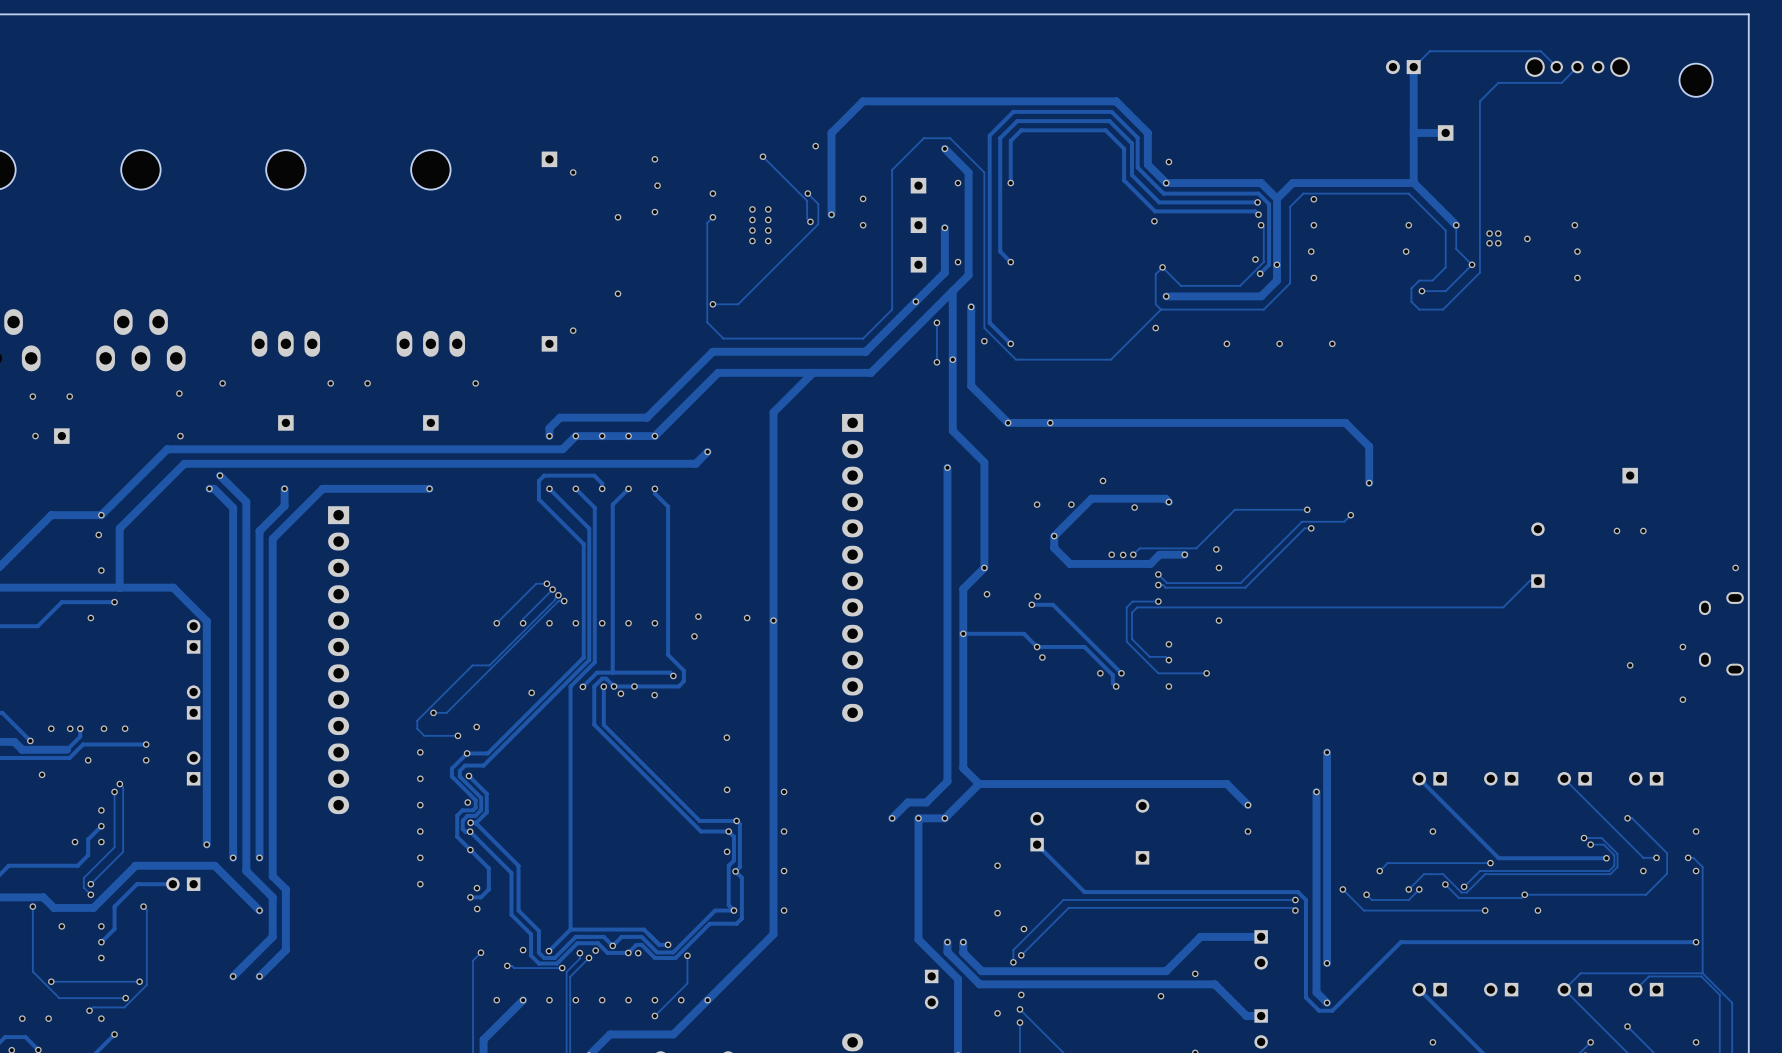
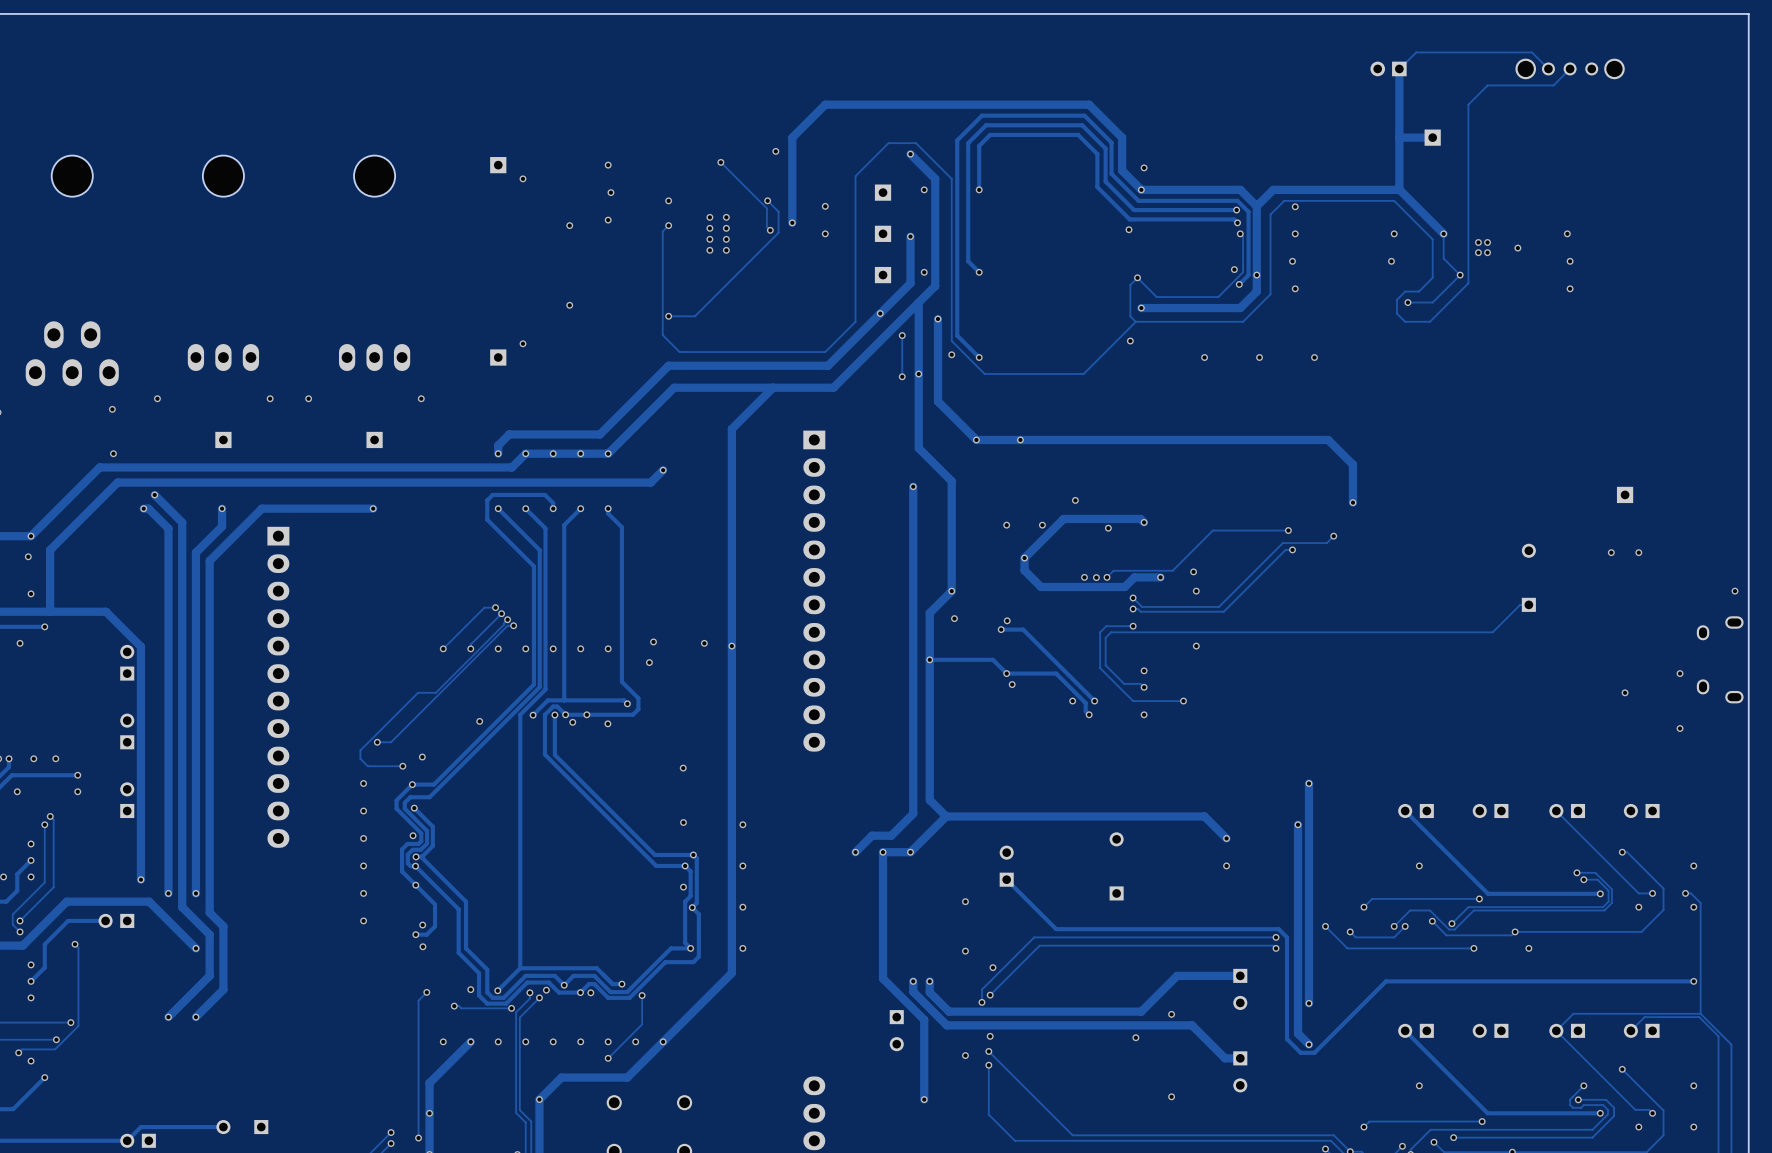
part: (1696, 80) -> none

